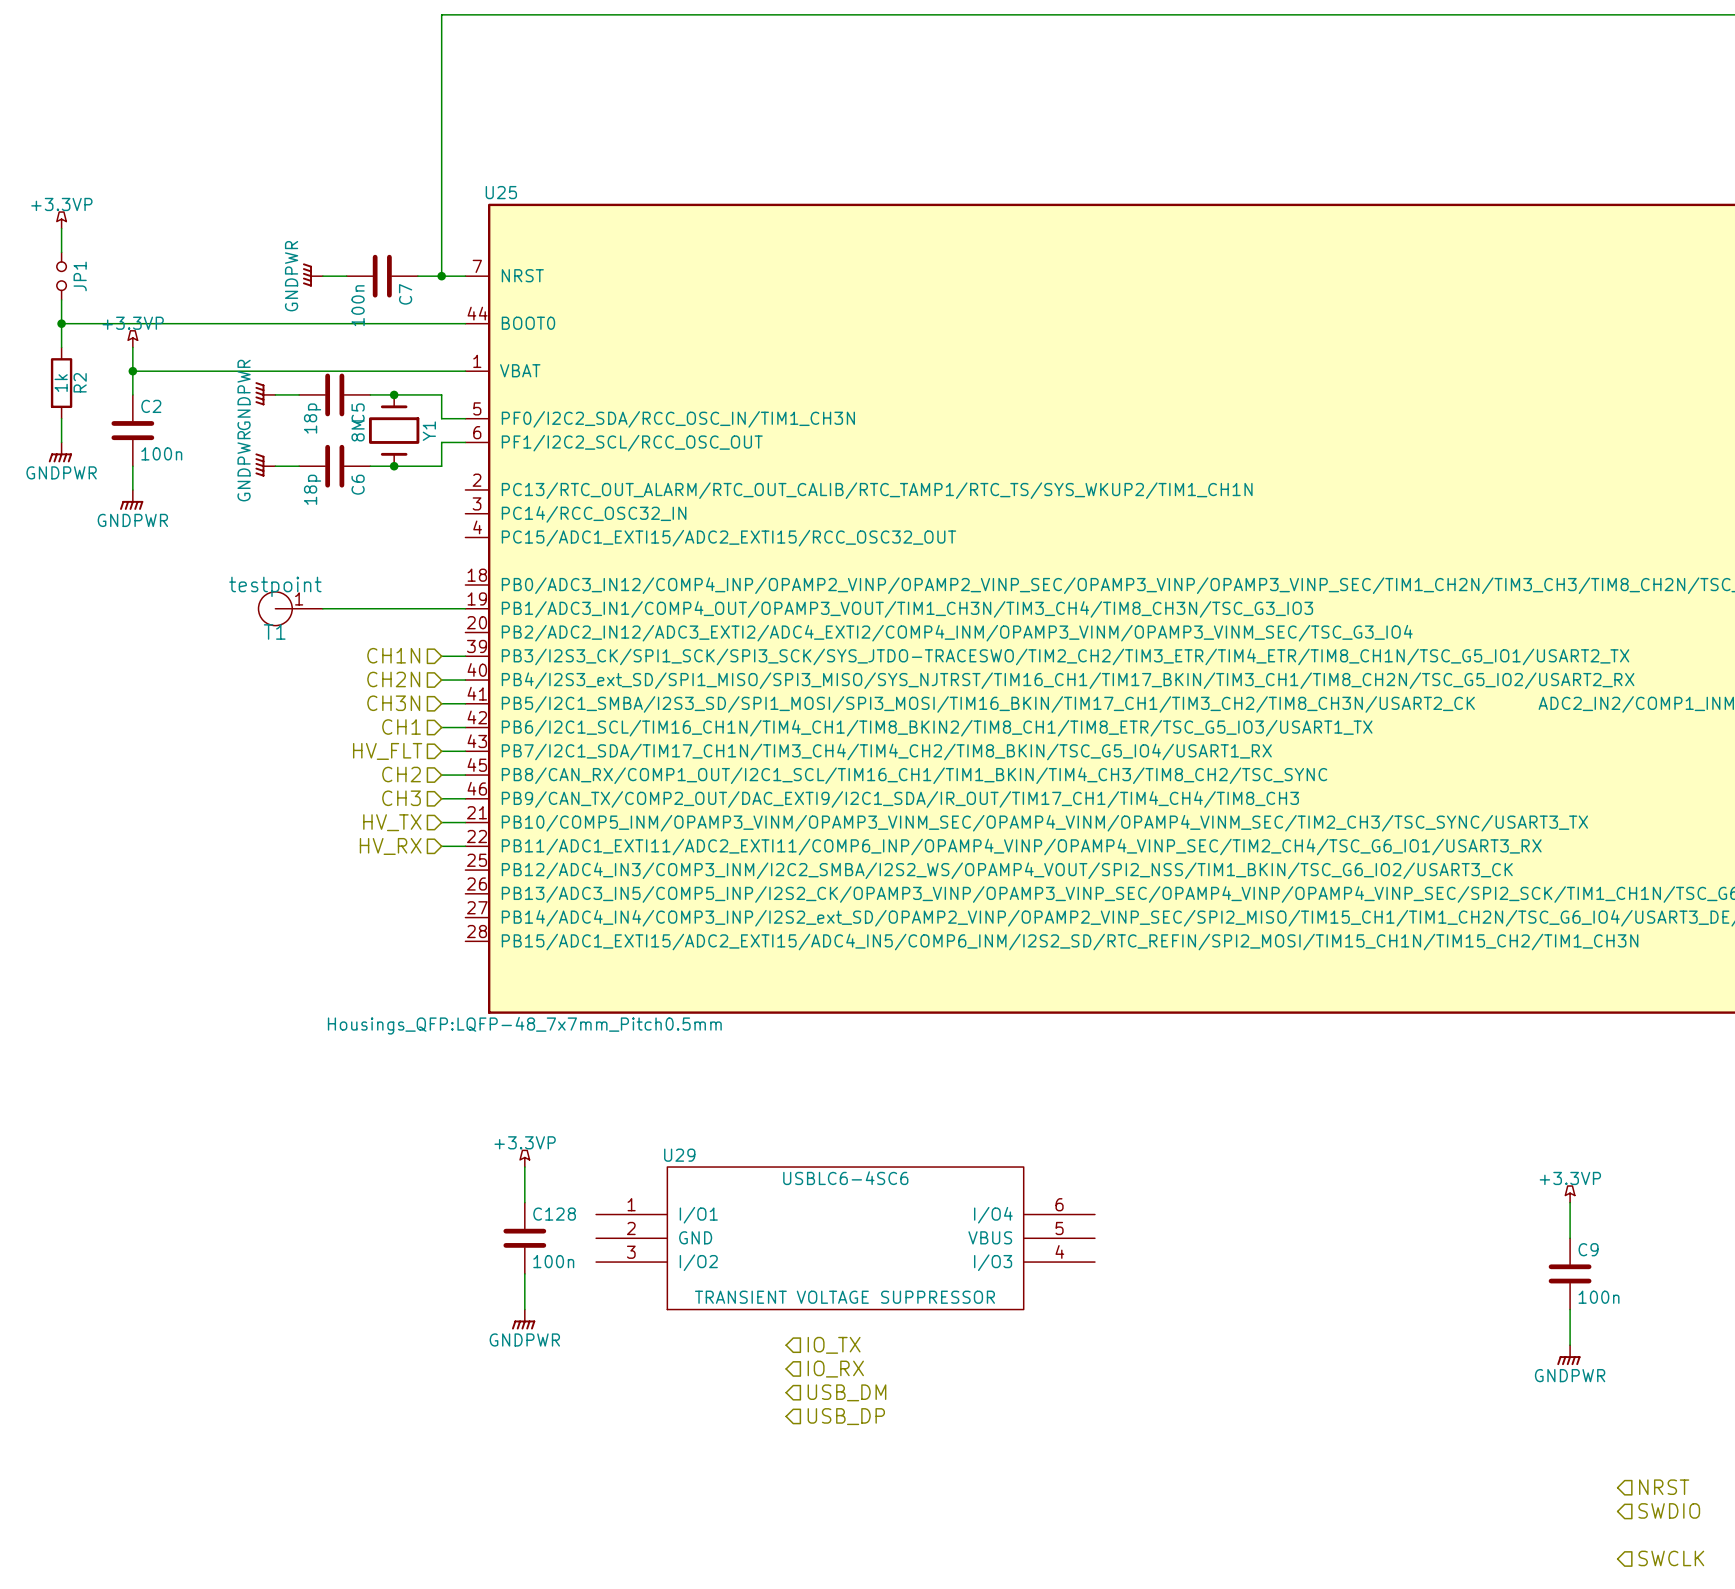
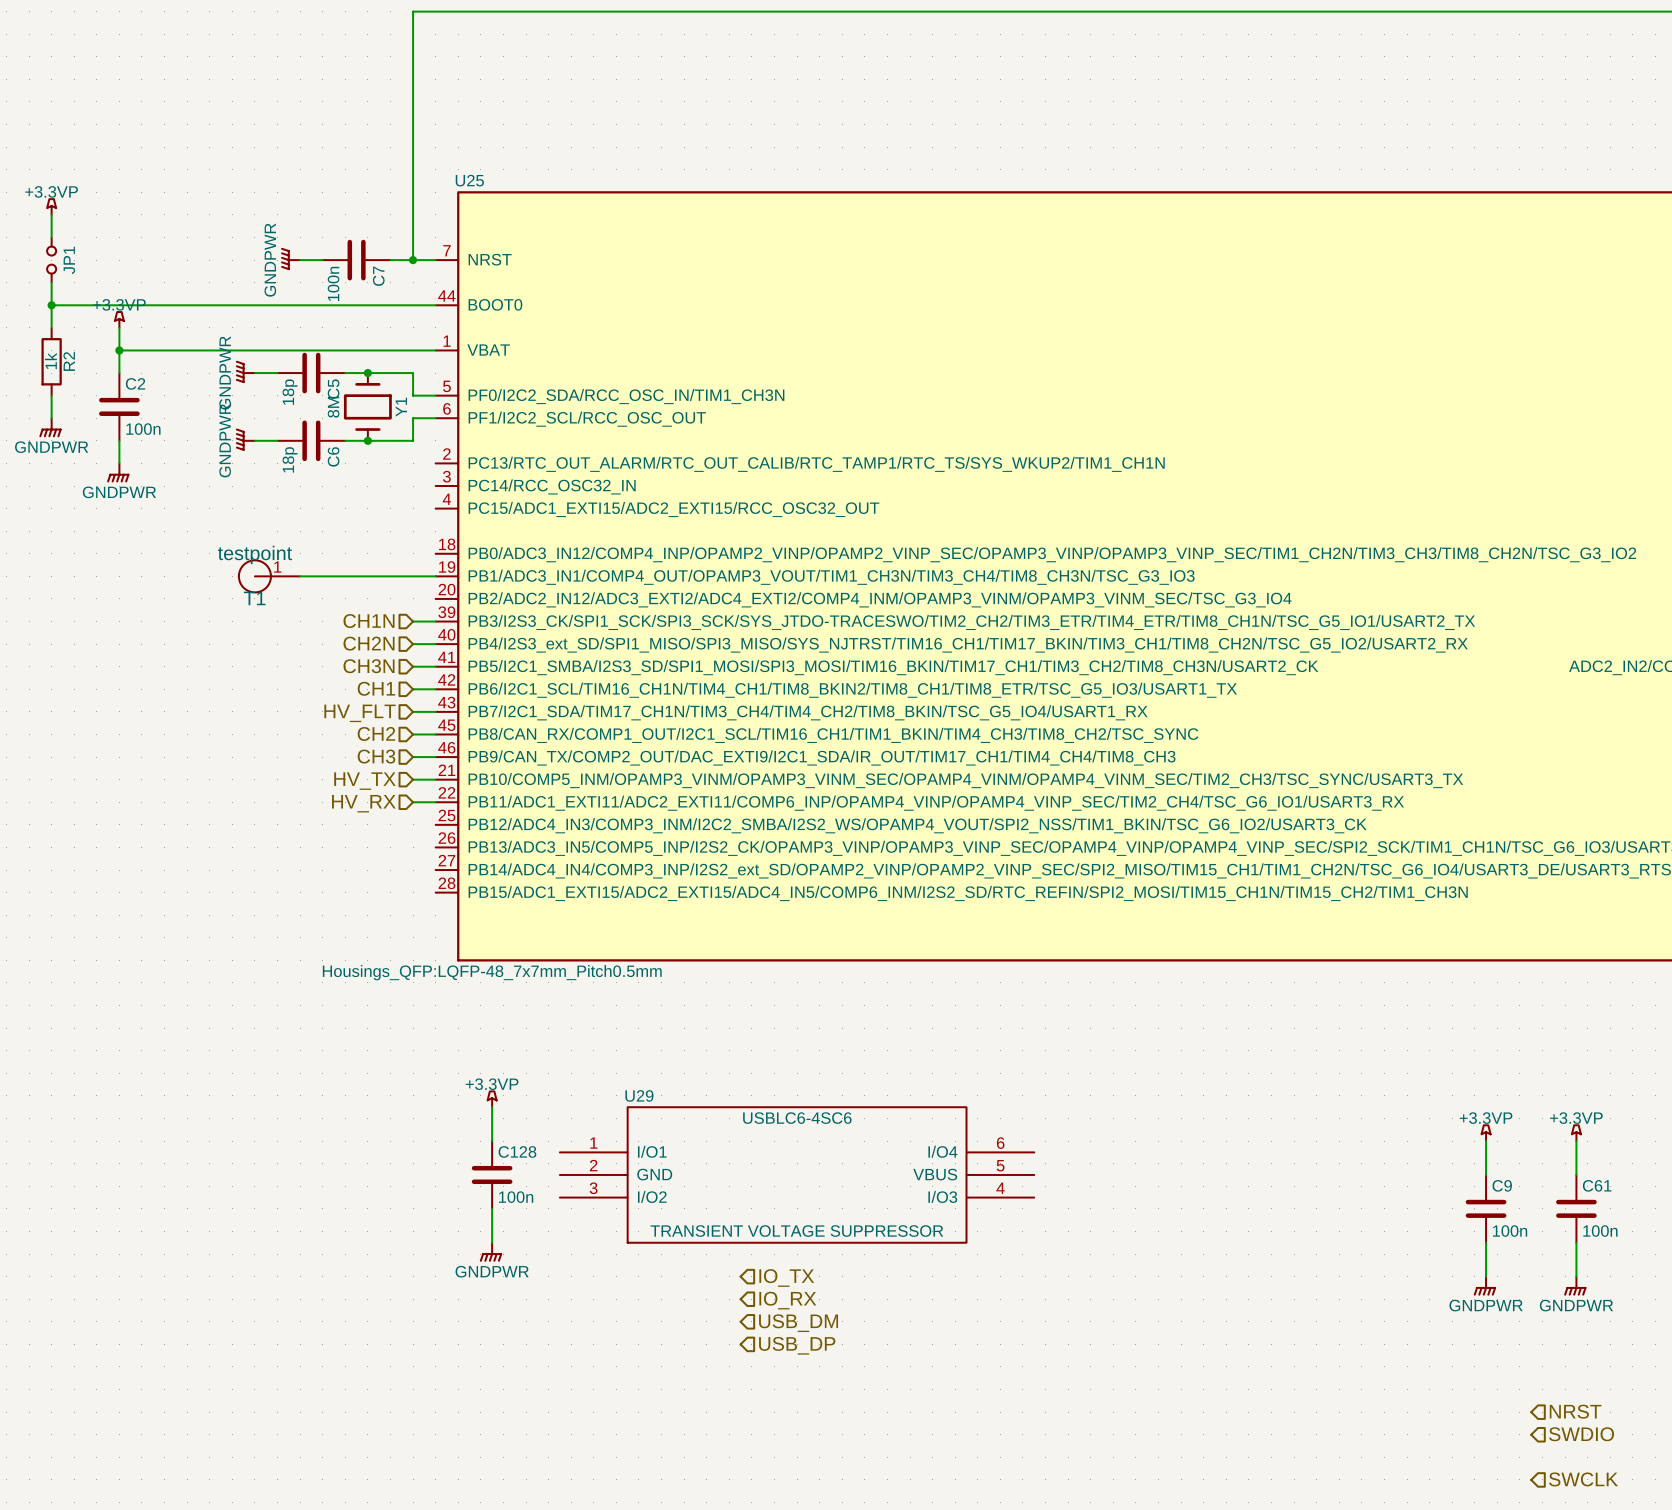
power symbol: none -> +3.3VP (1576, 1133)
wire: none -> (1576, 1141) (1576, 1174)
C61: none -> 100n (1576, 1208)
wire: none -> (1576, 1242) (1576, 1276)
power symbol: none -> GNDPWR (1575, 1286)

